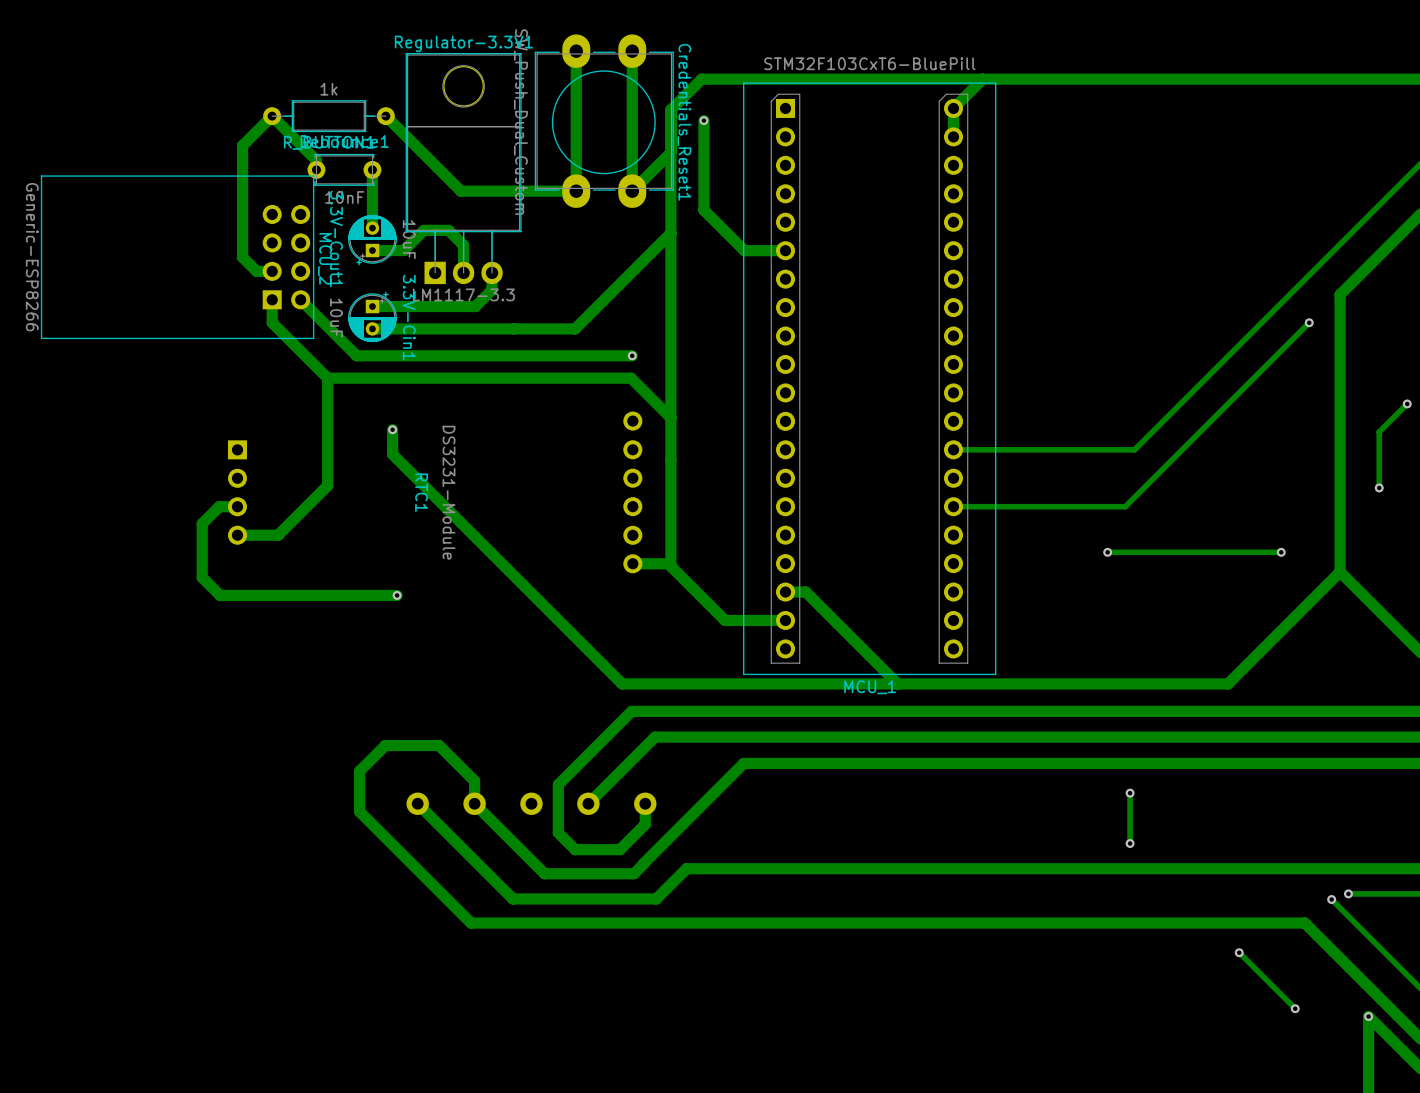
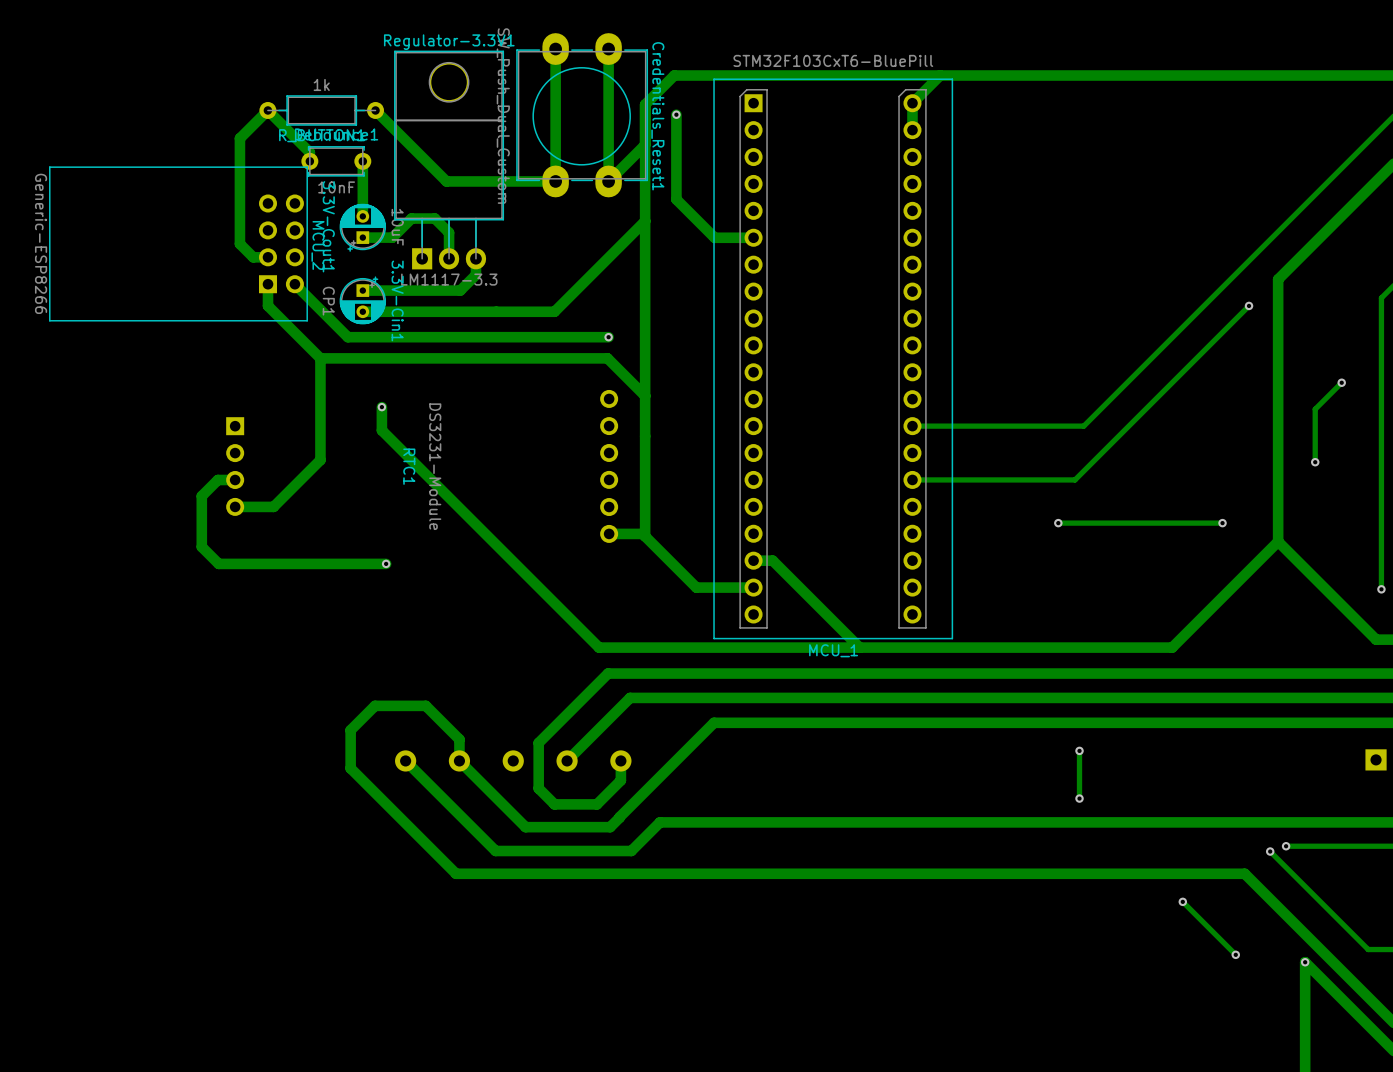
3.3V-Cin1 value: 10uF (336, 317) -> CP1 (328, 301)

